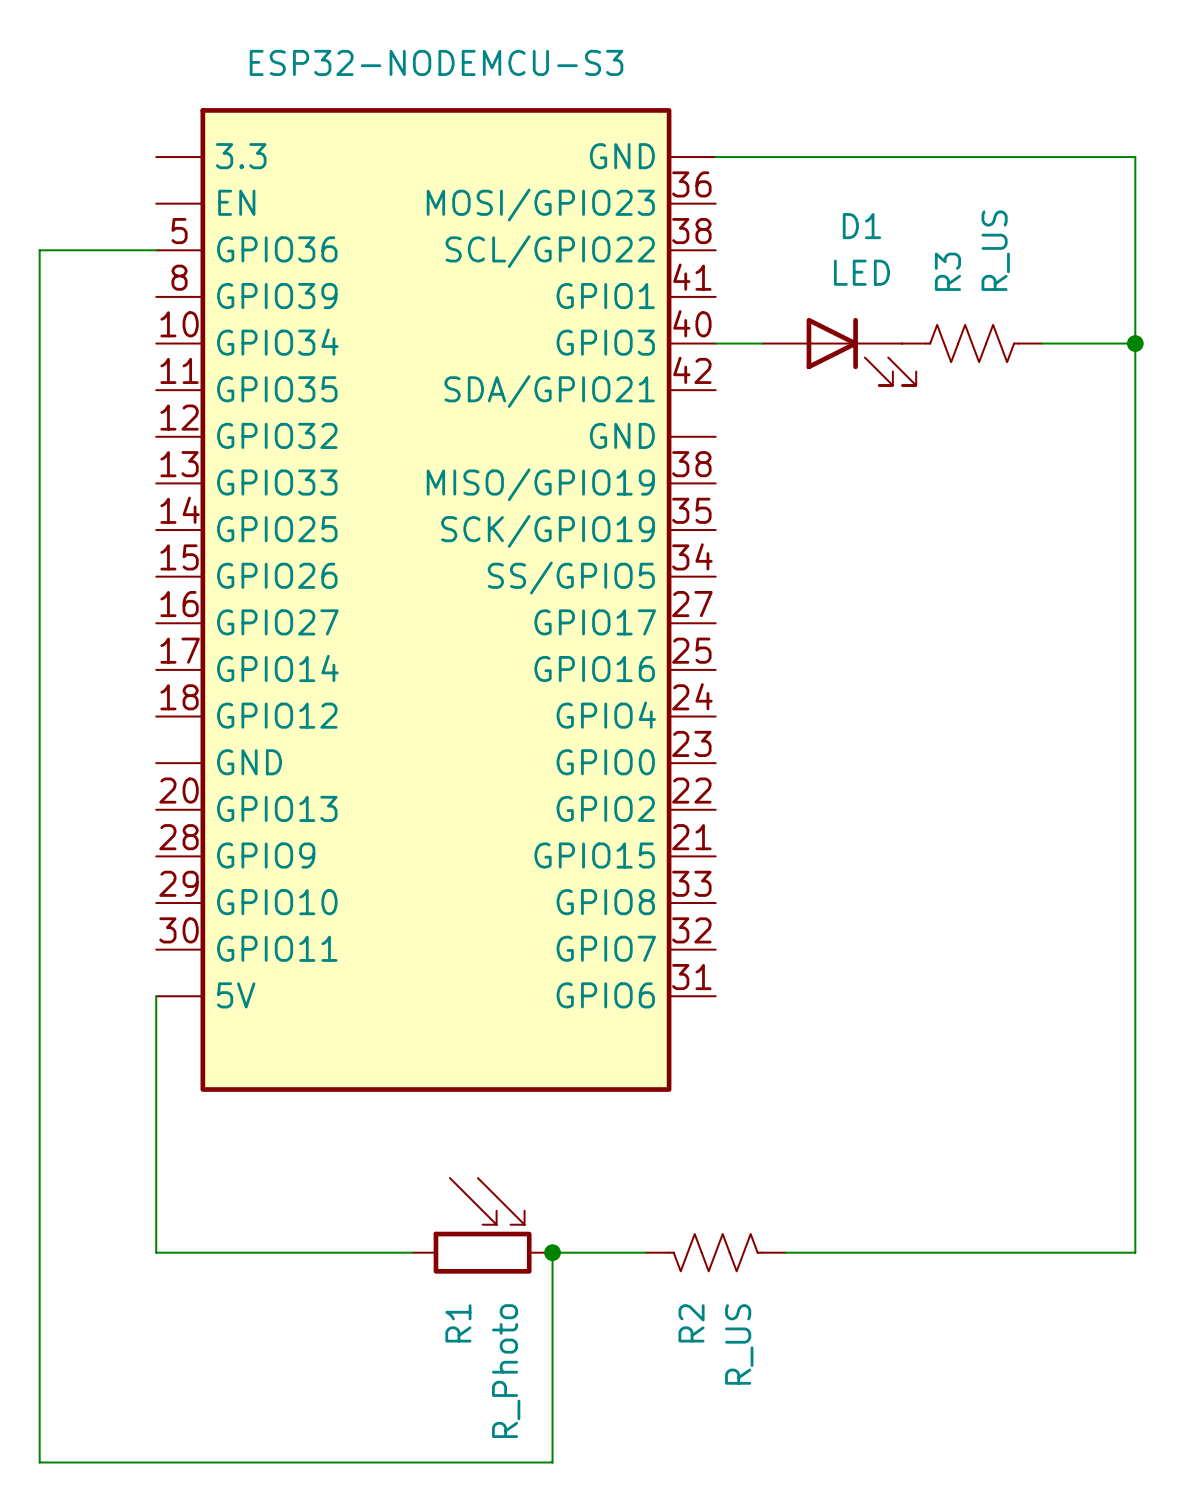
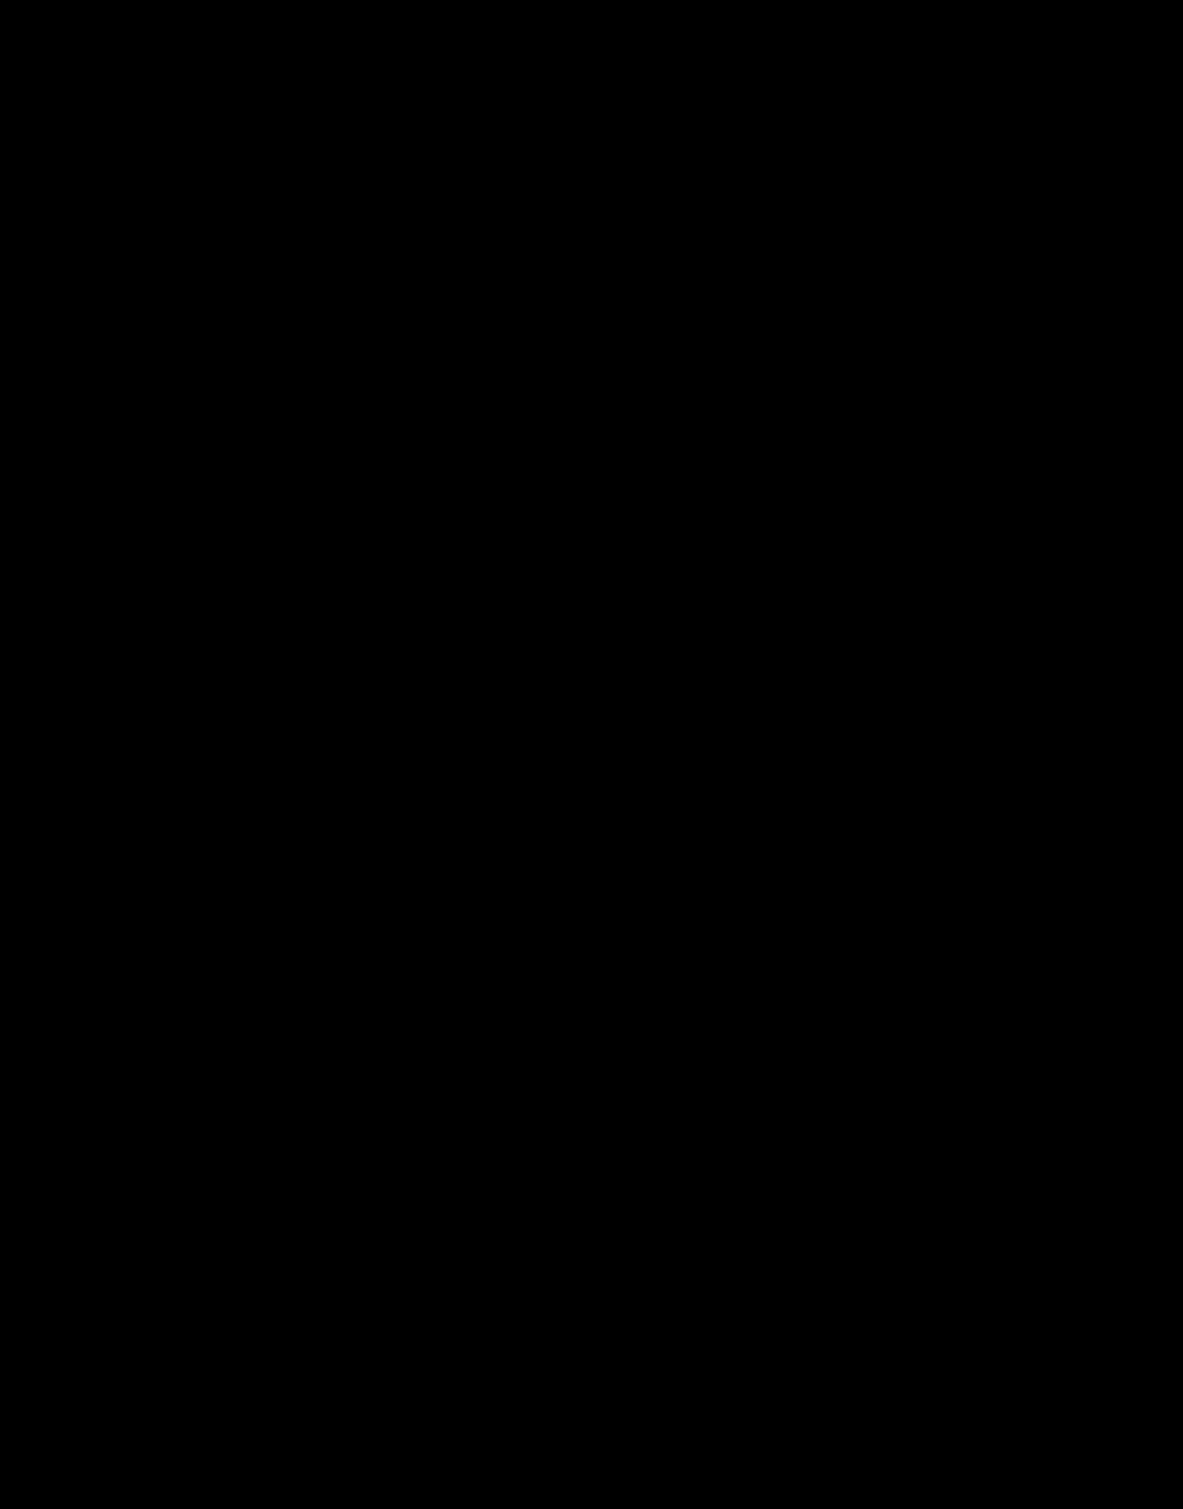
wire: (715, 157) (1135, 157) (1135, 1252) (785, 1252) -> none
wire: (156, 250) (39, 250) (39, 1462) (552, 1462) (552, 1252) (645, 1252) -> none
wire: (715, 343) (762, 343) -> none
R3: R_US (972, 343) -> none
wire: (1042, 343) (1135, 343) -> none
junction: (1135, 343) -> none
D1: LED (839, 351) -> none
part: ESP32-NODEMCU-S3 (435, 599) -> none
wire: (156, 996) (156, 1252) (412, 1252) -> none
R1: R_Photo (482, 1225) -> none
junction: (552, 1252) -> none
R2: R_US (715, 1252) -> none

